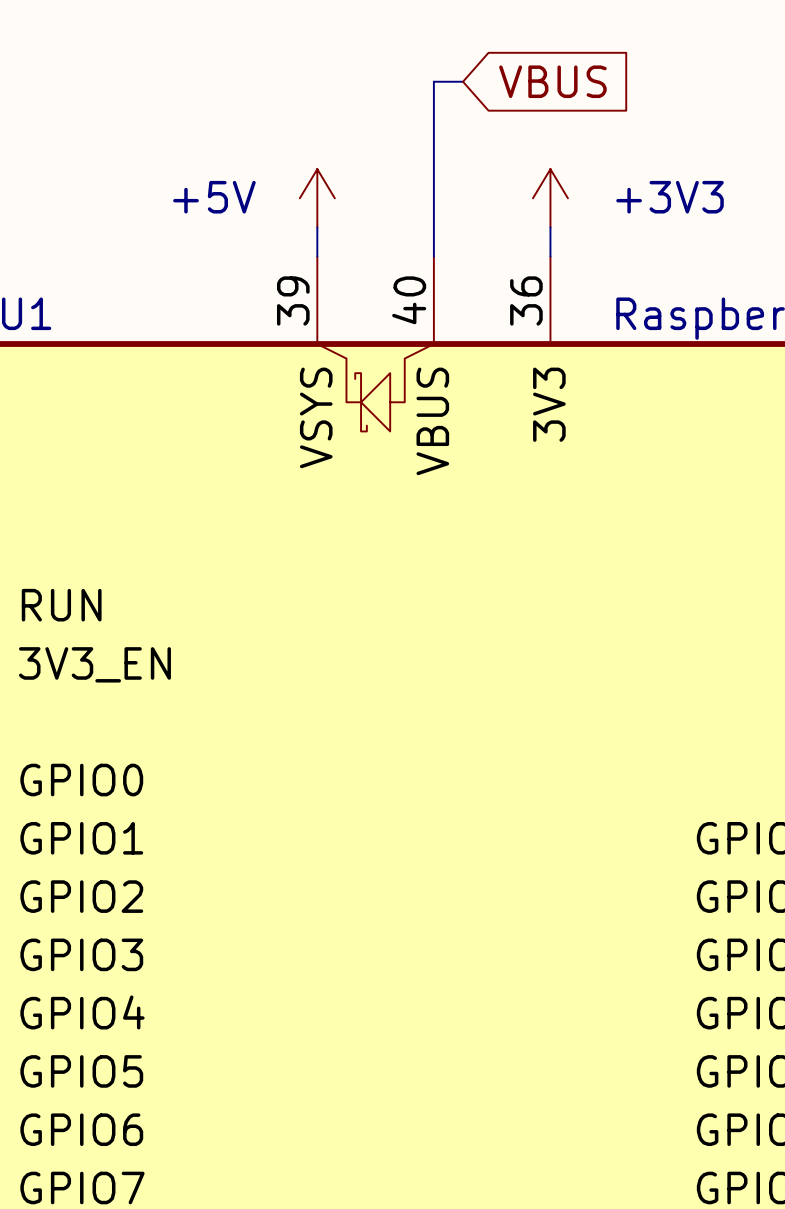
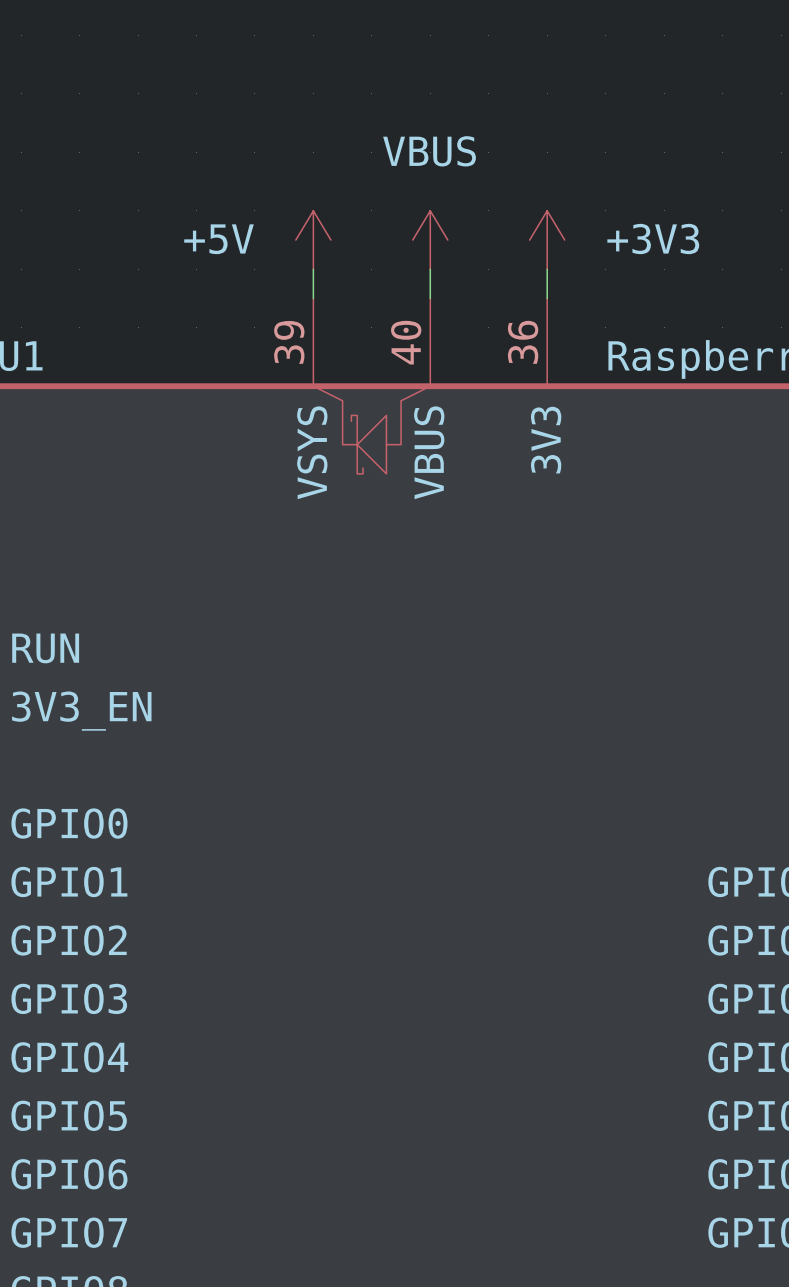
wire: (463, 81) (433, 81) (433, 227) -> none
global label: VBUS (552, 81) -> none
power symbol: none -> VBUS (430, 240)

